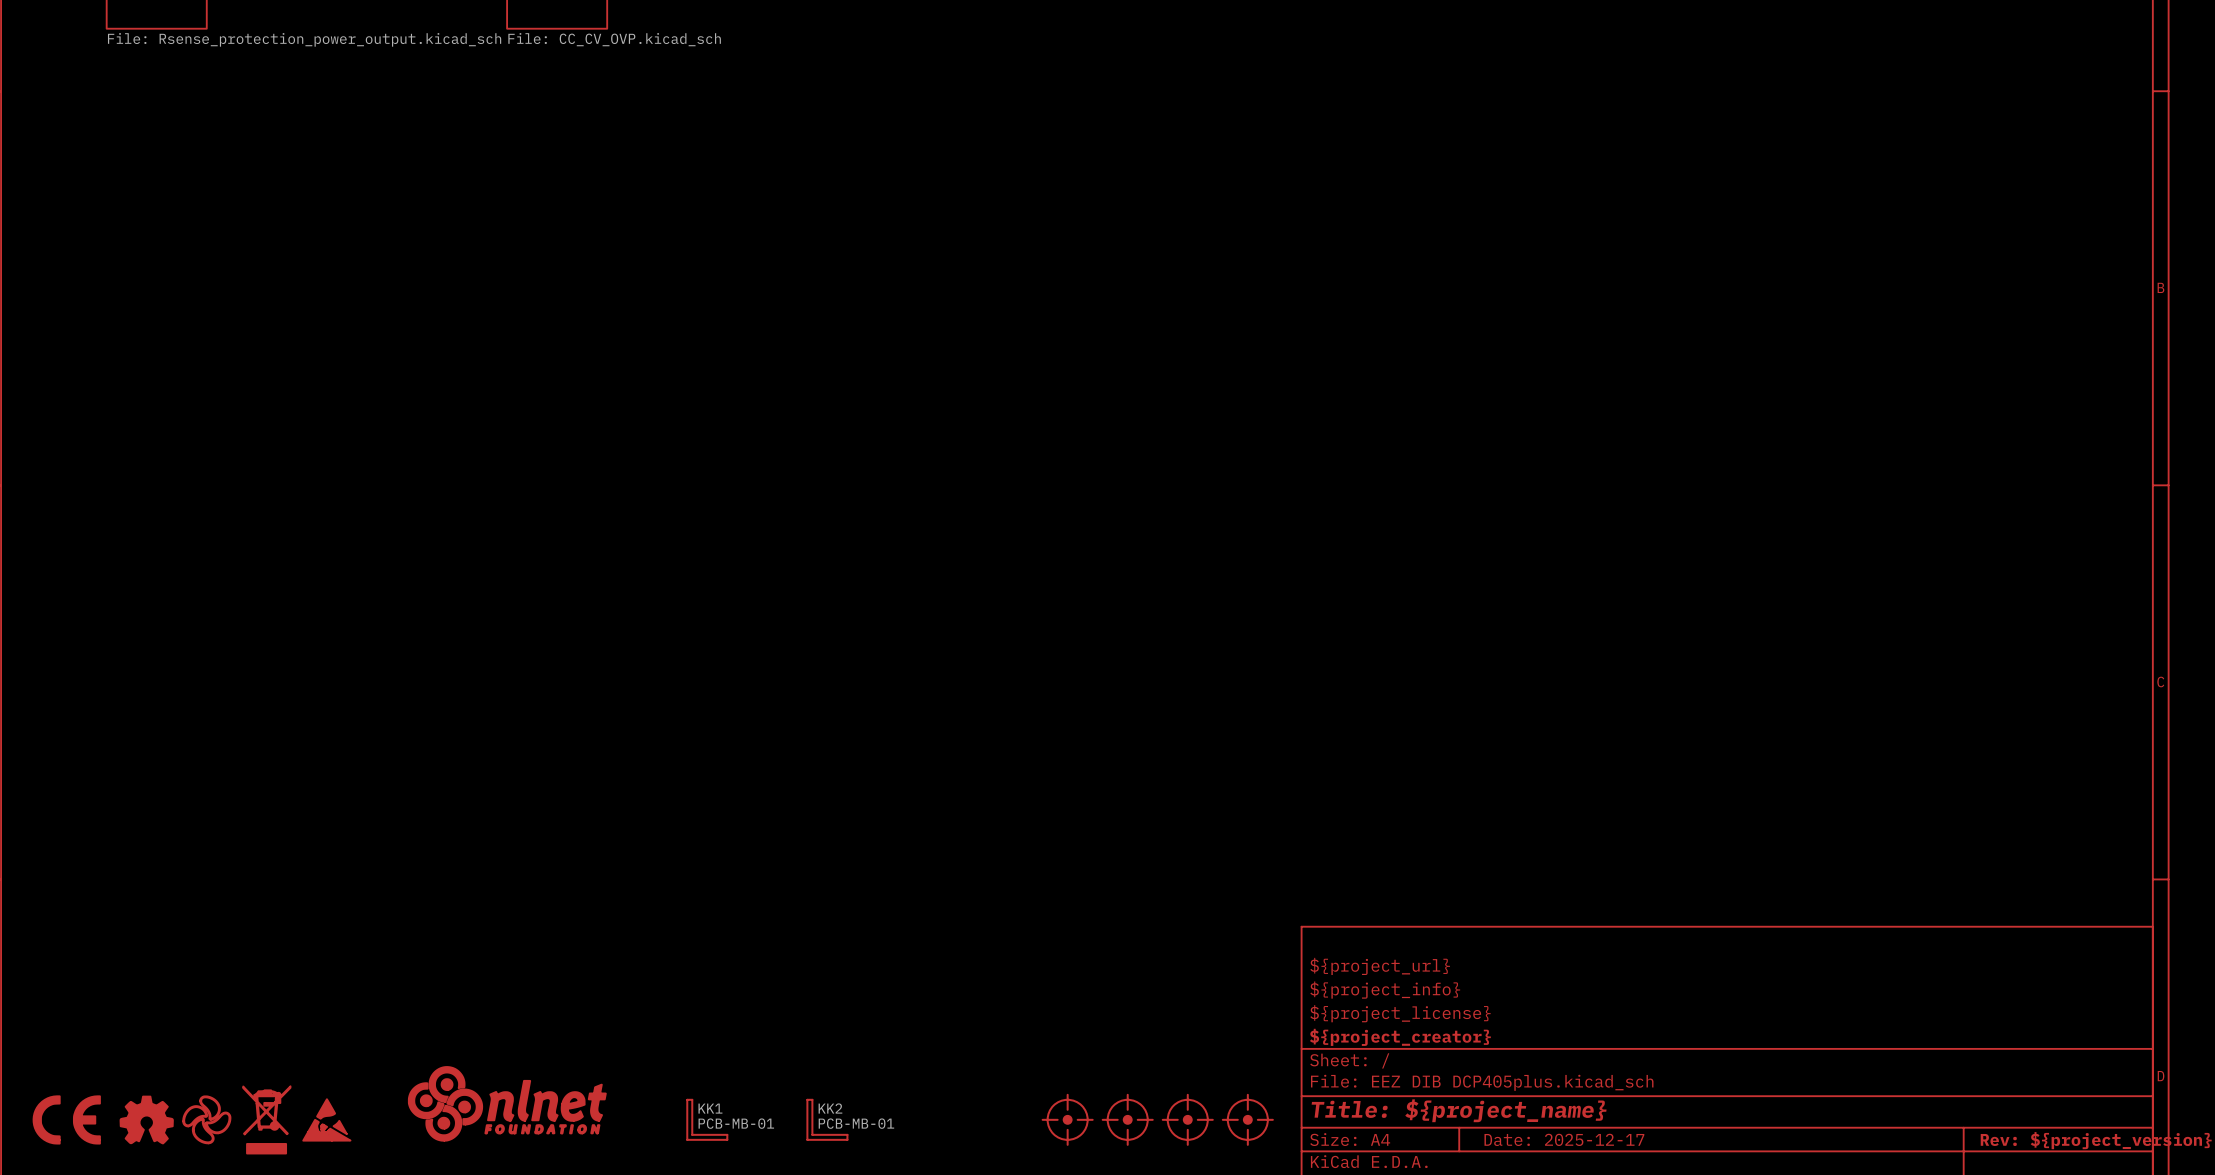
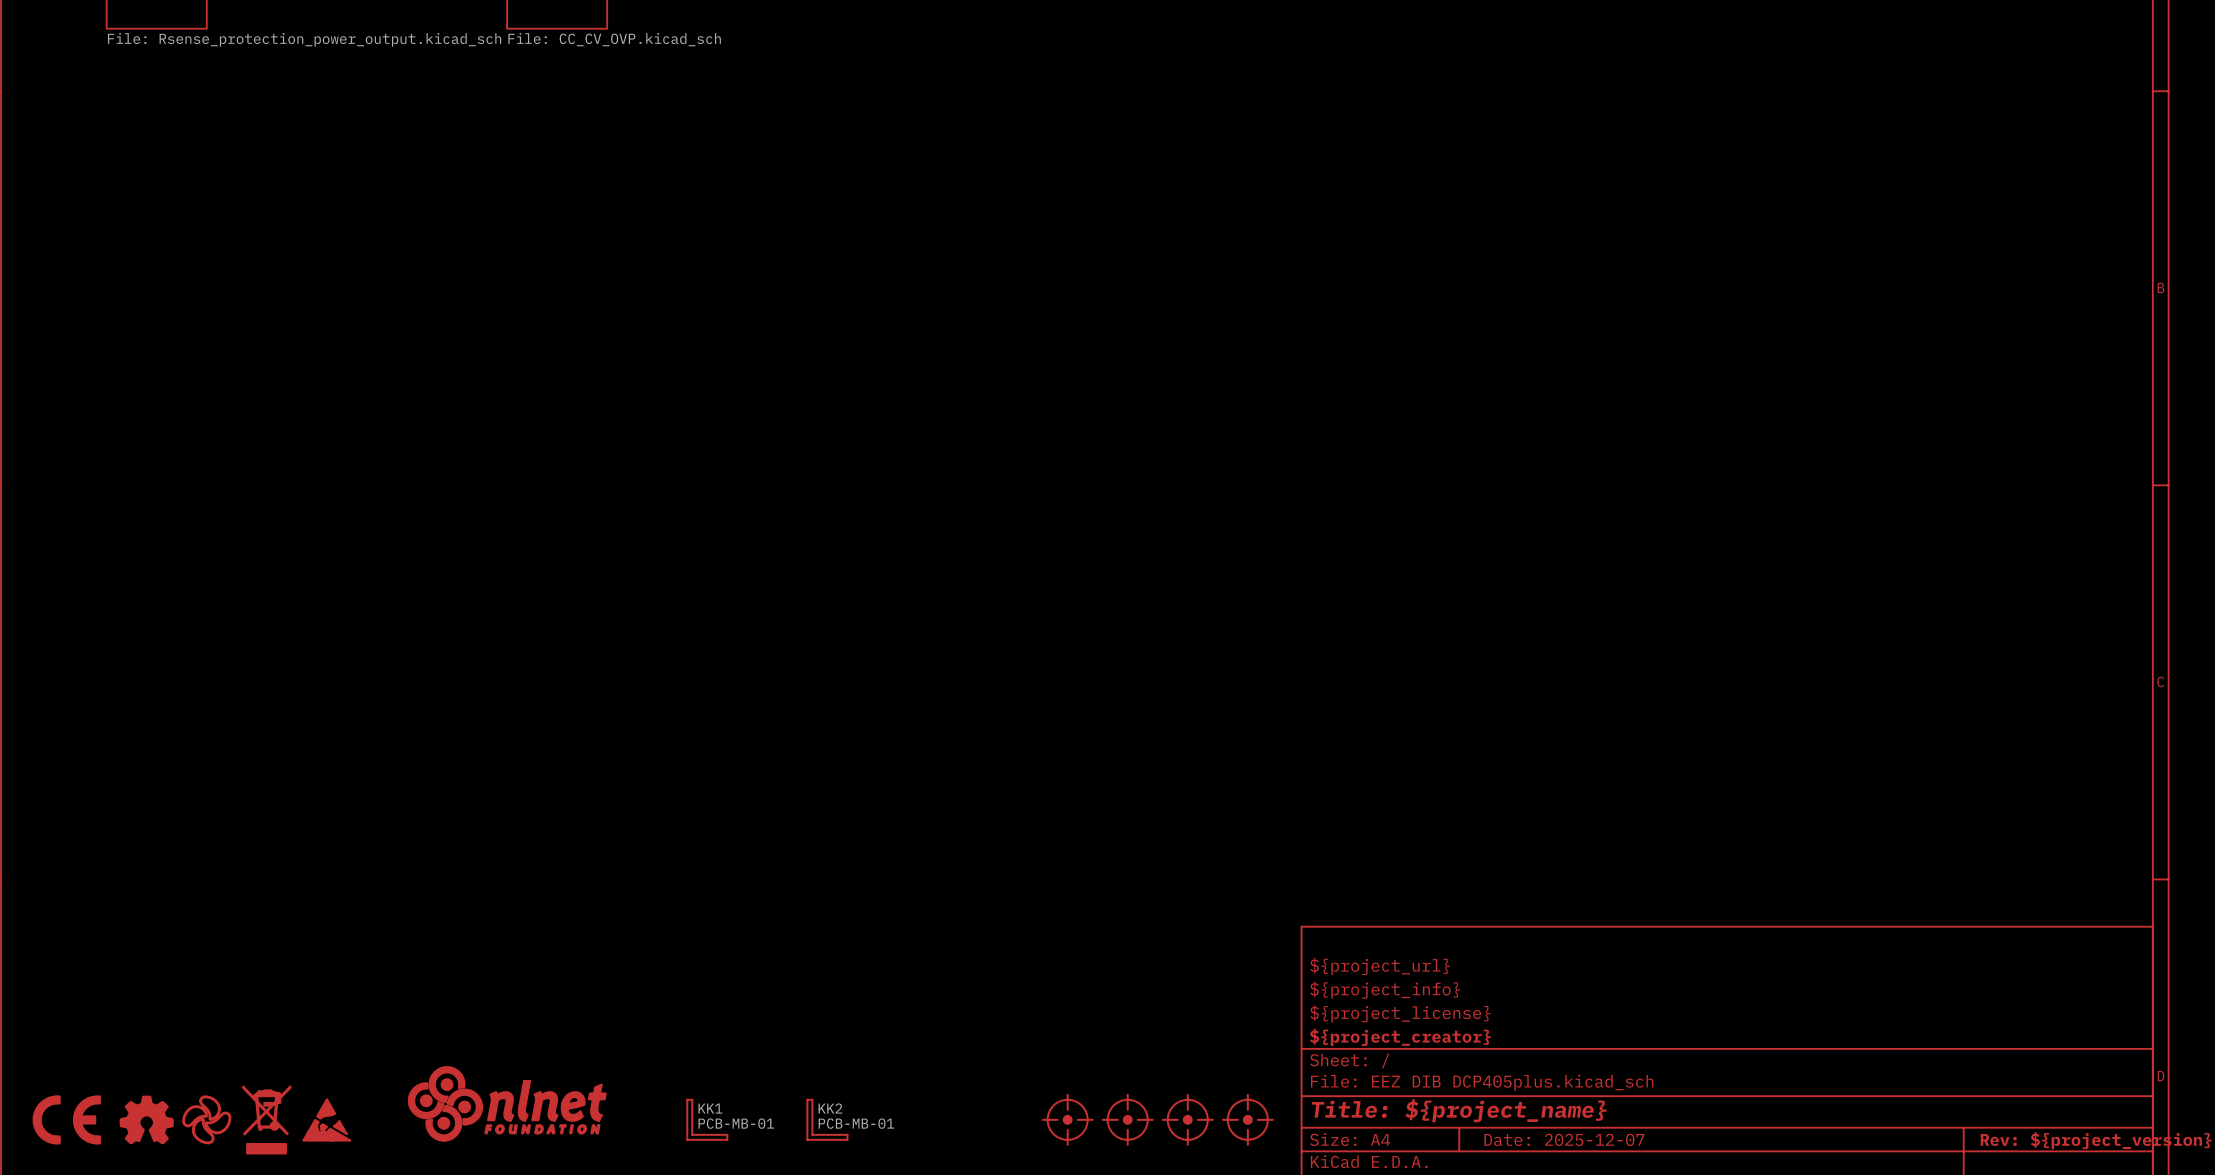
title block: Date: 2025-12-17 (1564, 1139) -> Date: 2025-12-07 (1564, 1139)

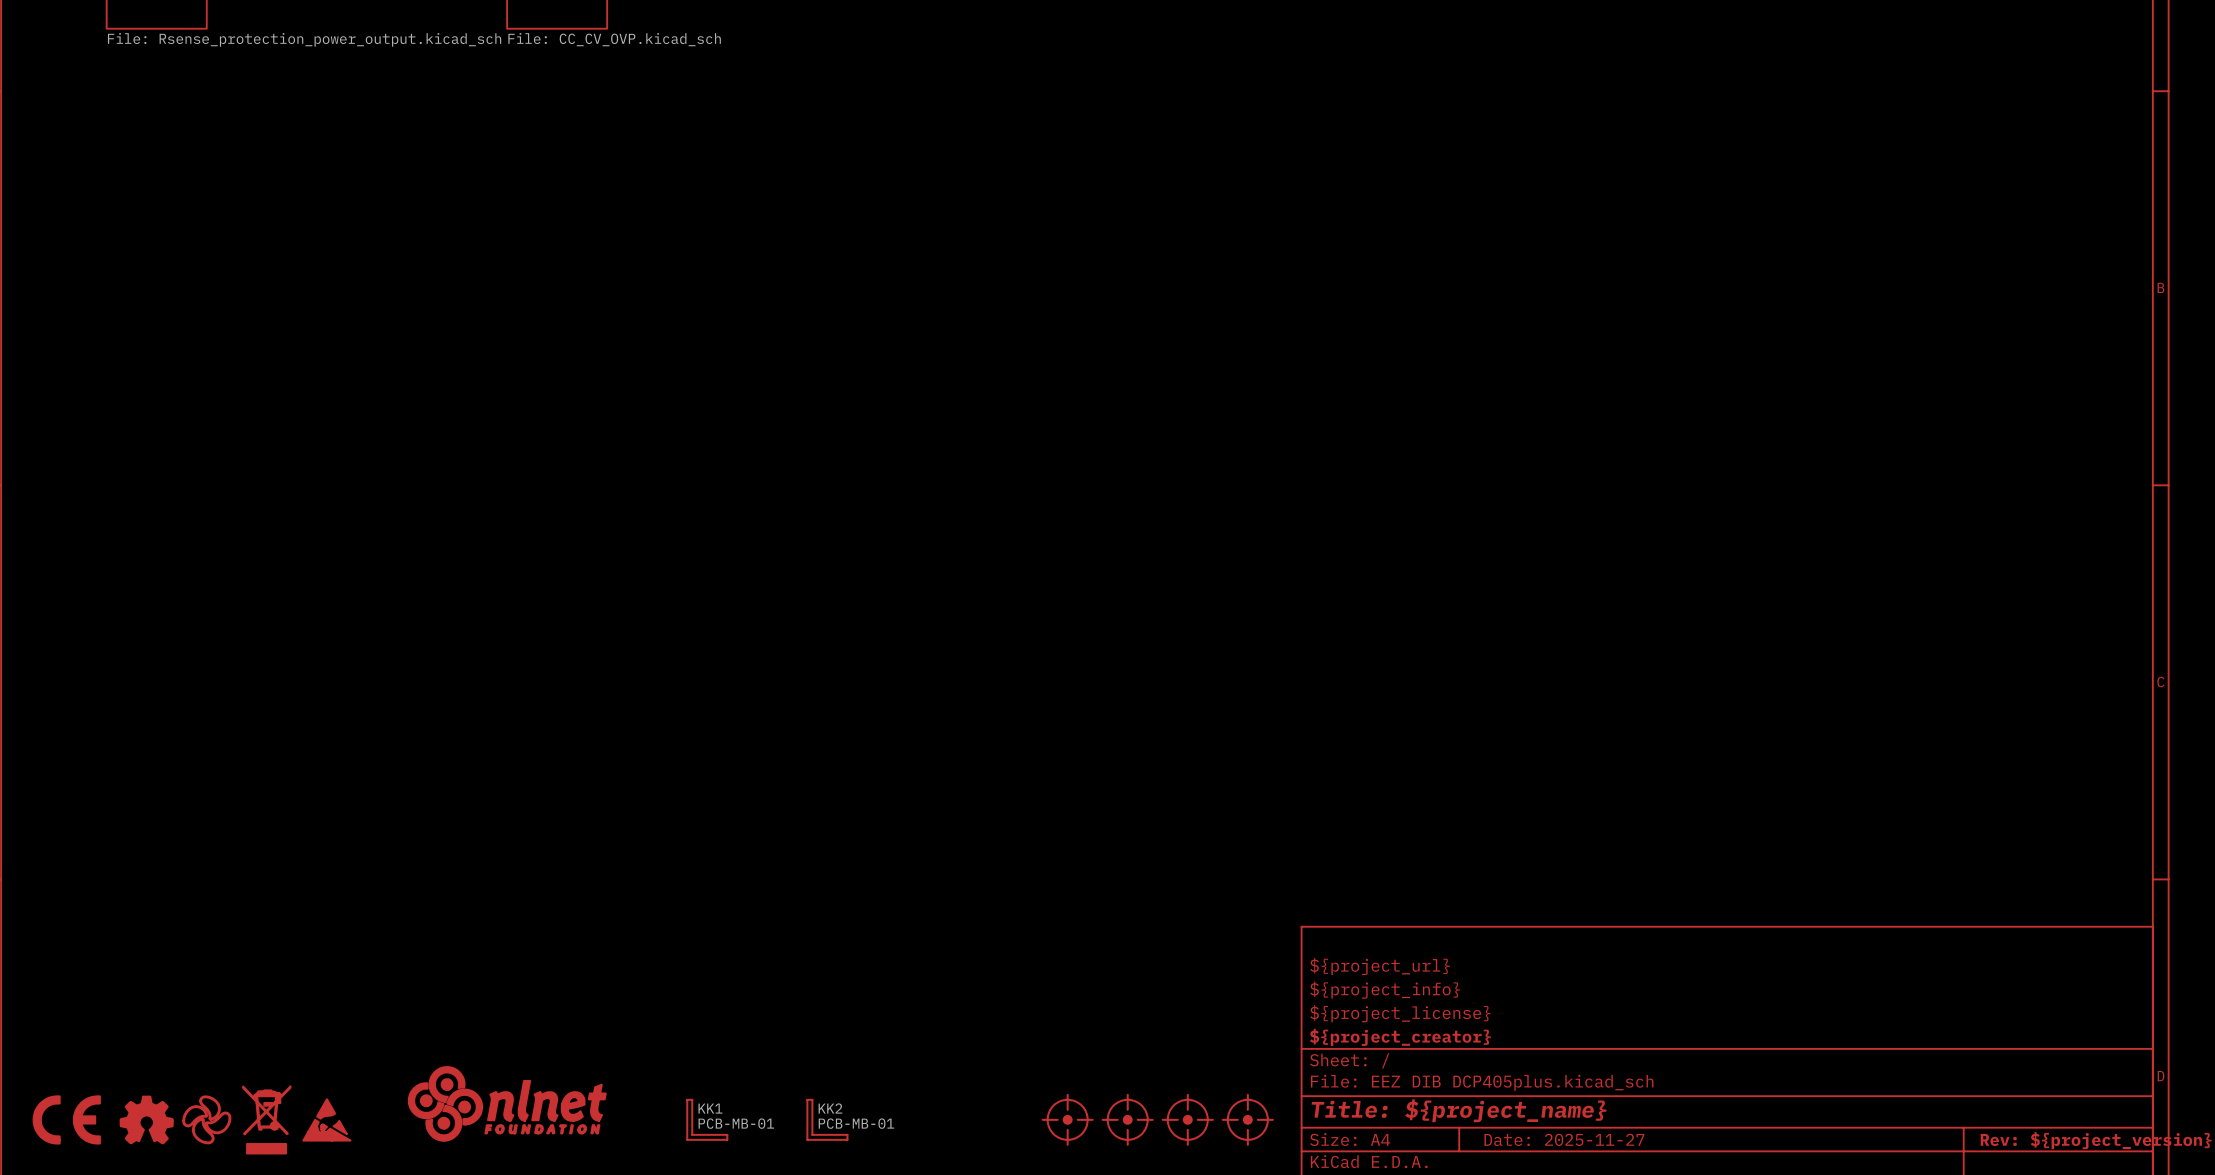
title block: Date: 2025-12-07 (1564, 1139) -> Date: 2025-11-27 (1564, 1139)

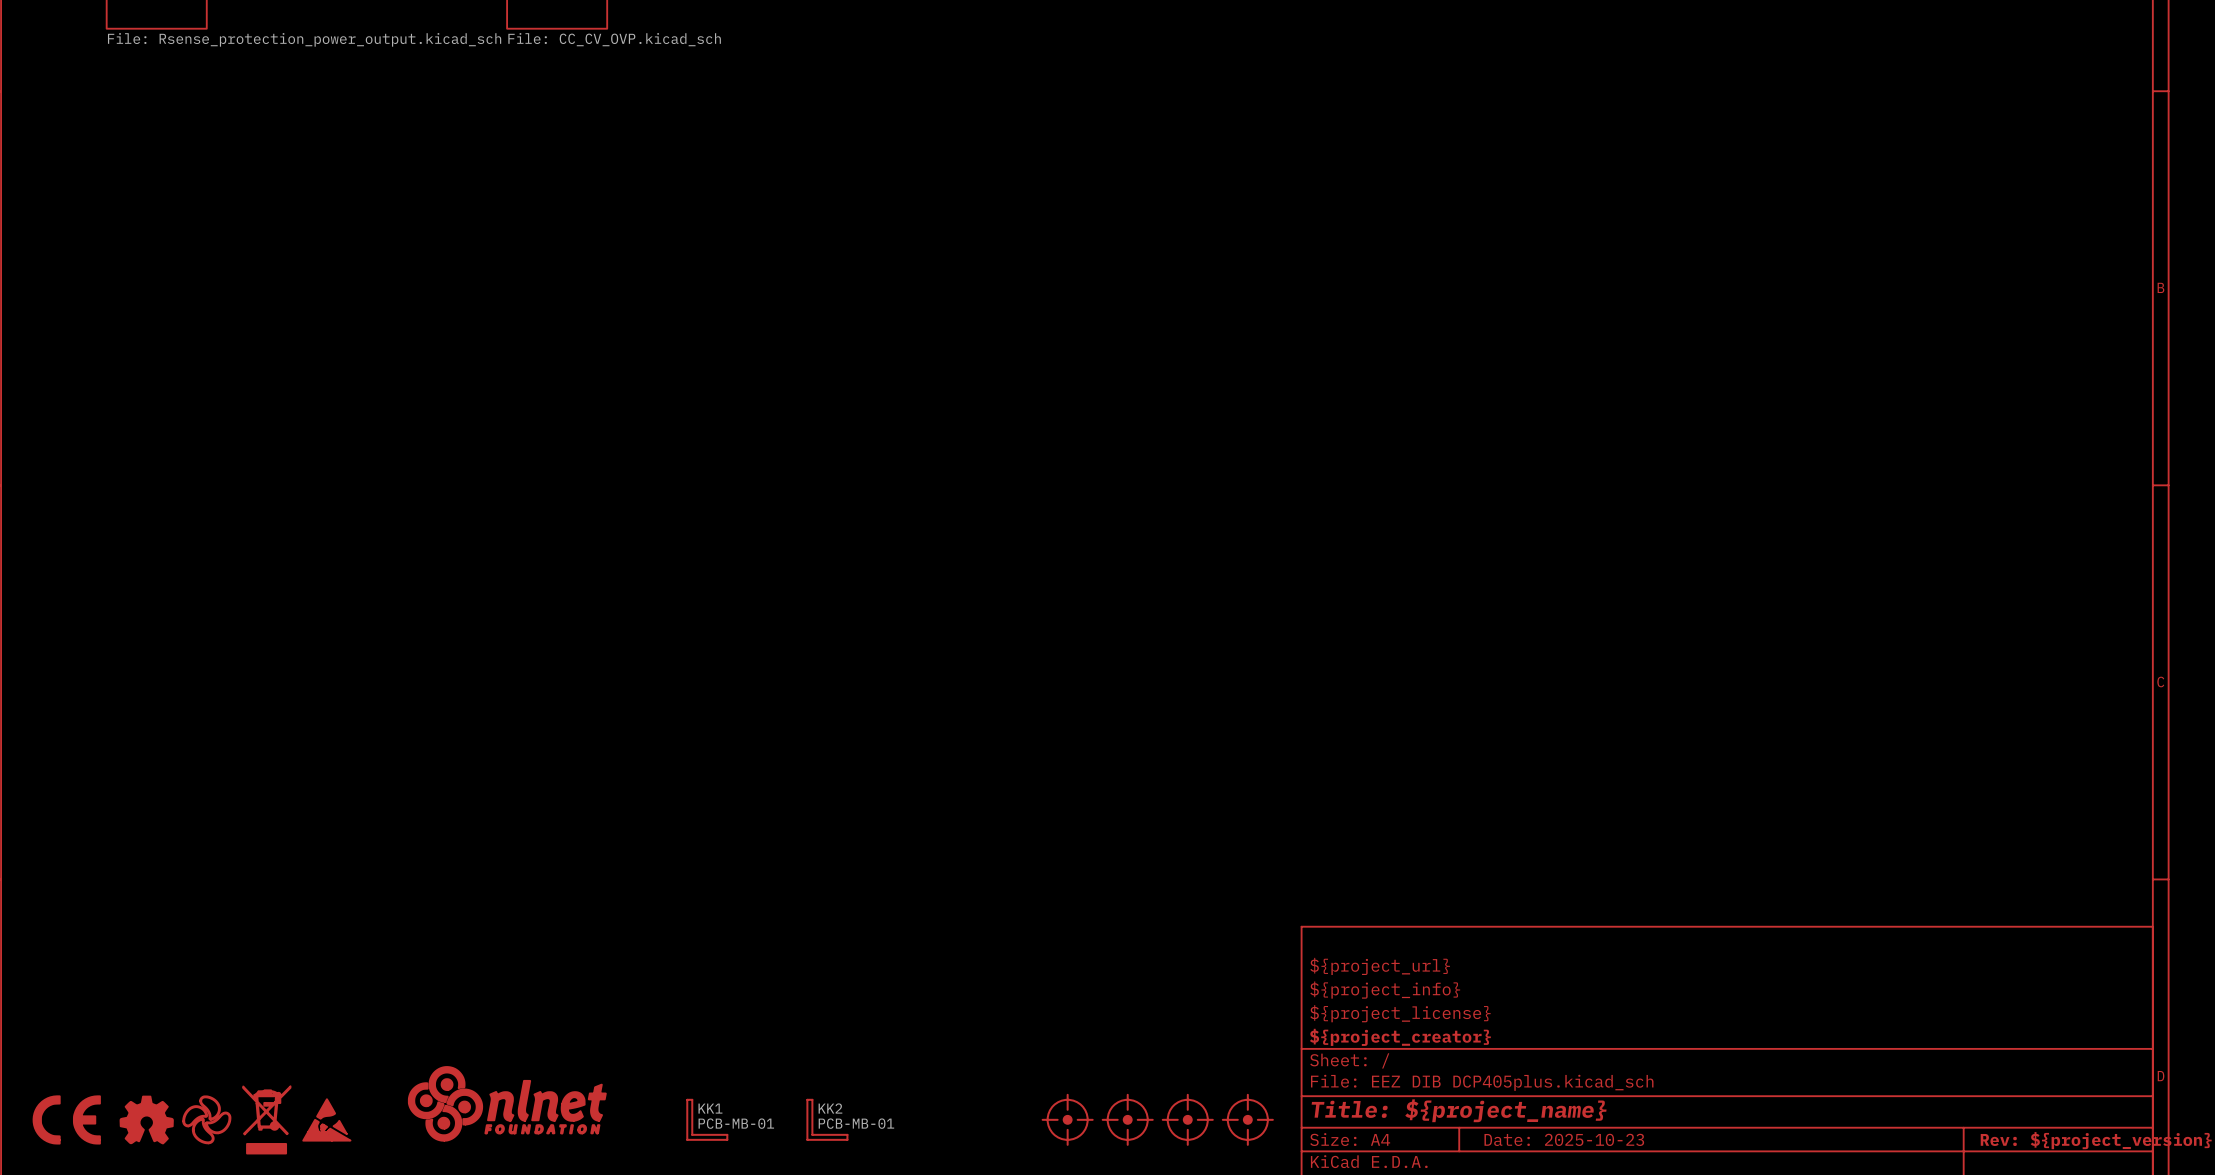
title block: Date: 2025-11-27 (1564, 1139) -> Date: 2025-10-23 (1564, 1139)

